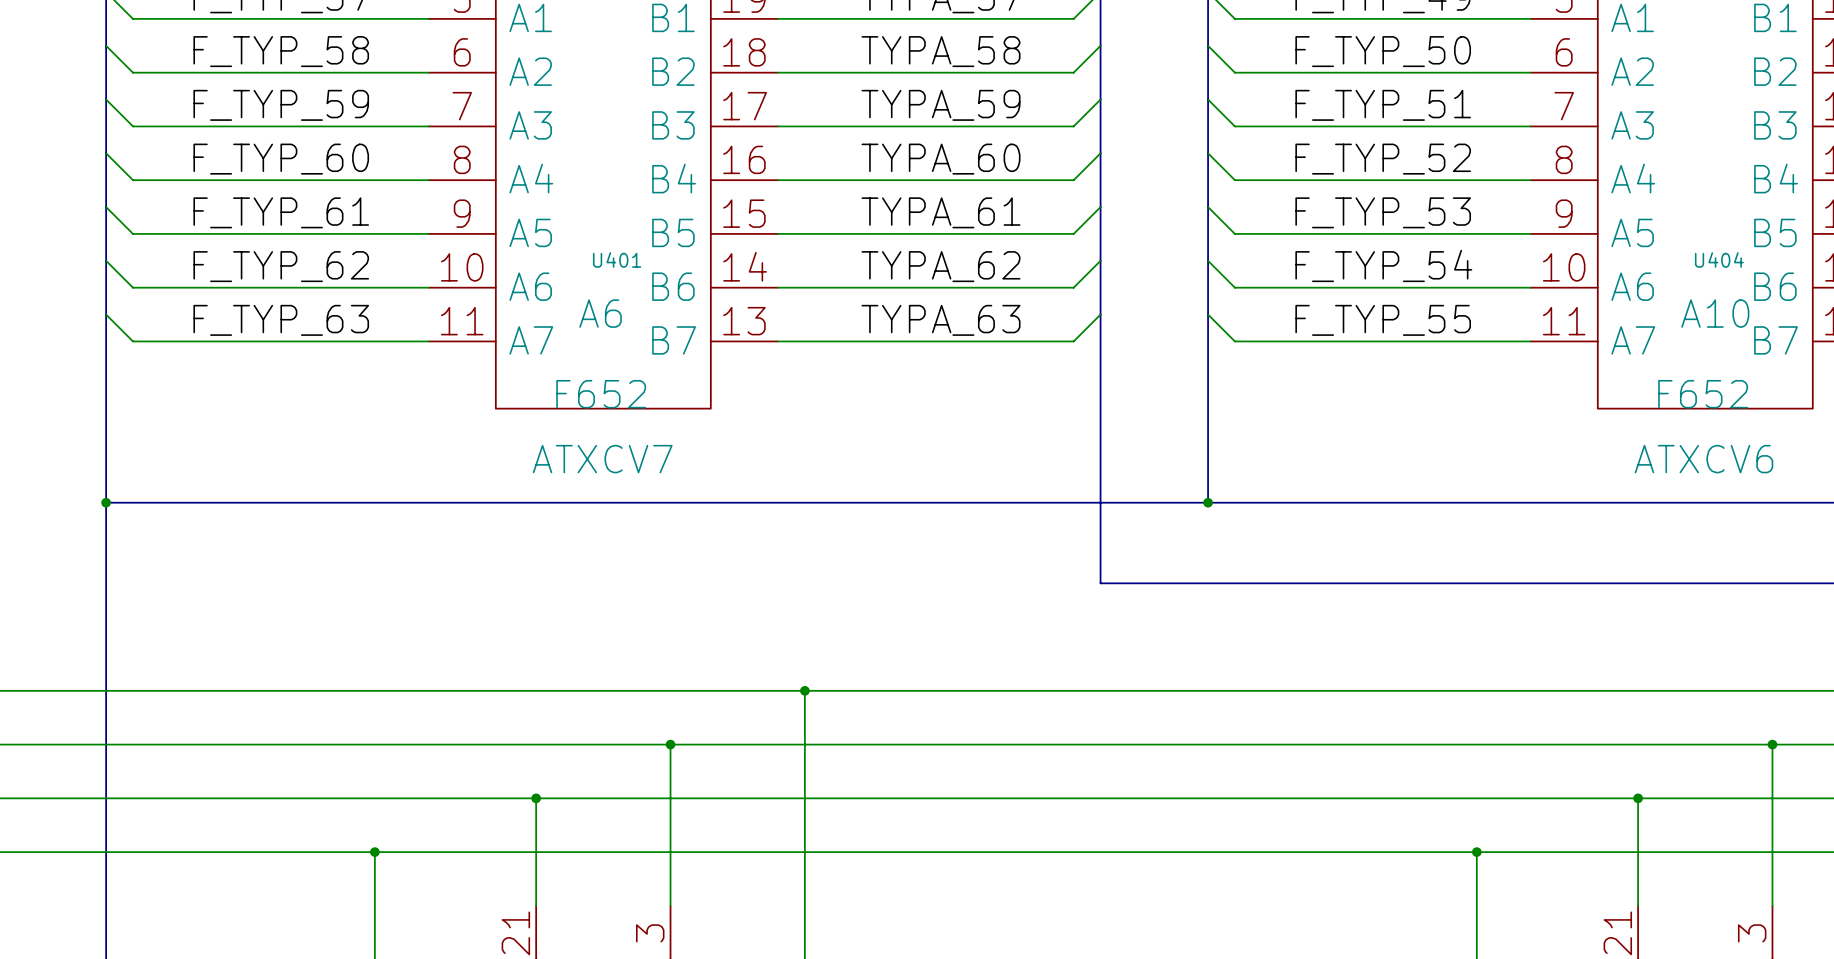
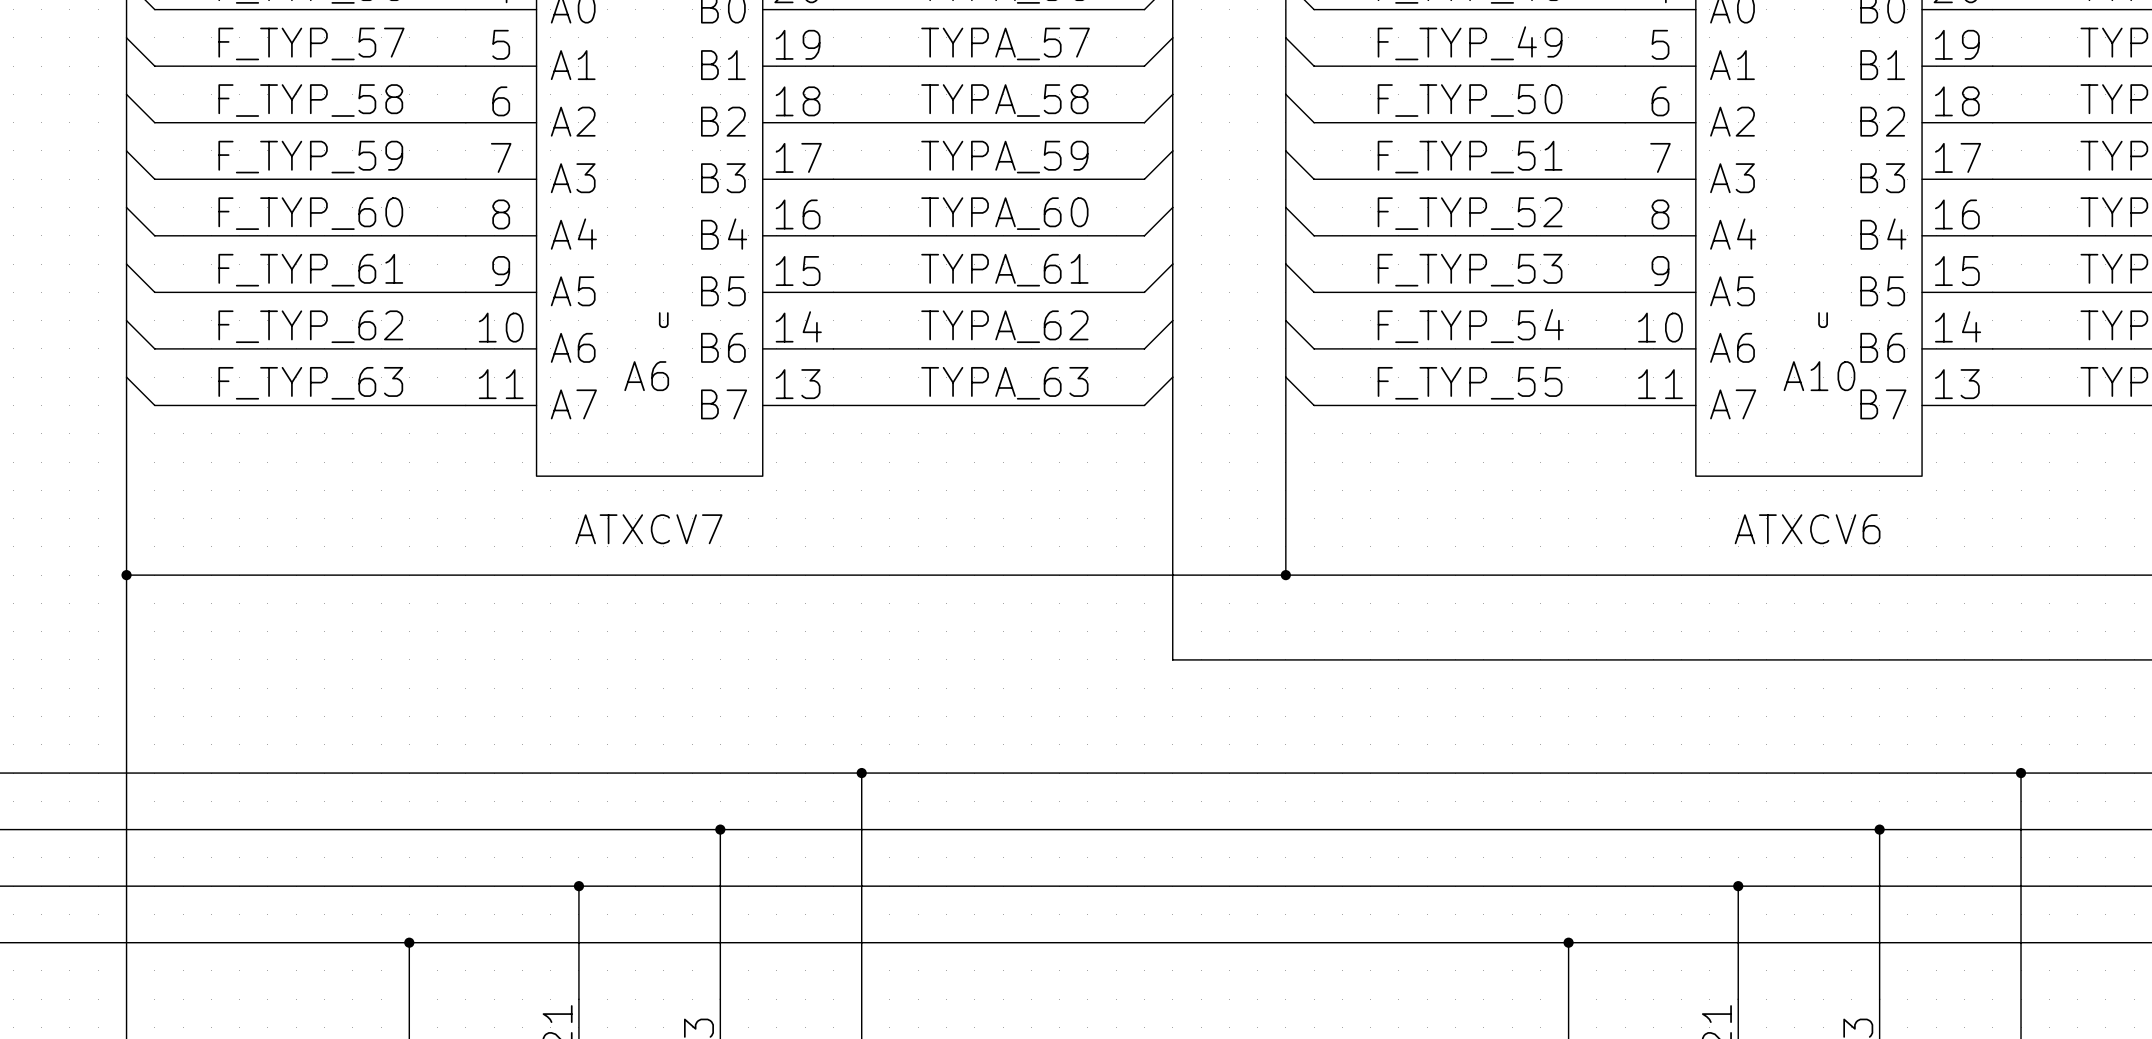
U401 name: U401 (617, 259) -> U (663, 320)
U404 name: U404 (1719, 259) -> U (1823, 320)
U401 value: F652 (601, 394) -> none
U404 value: F652 (1703, 394) -> none

